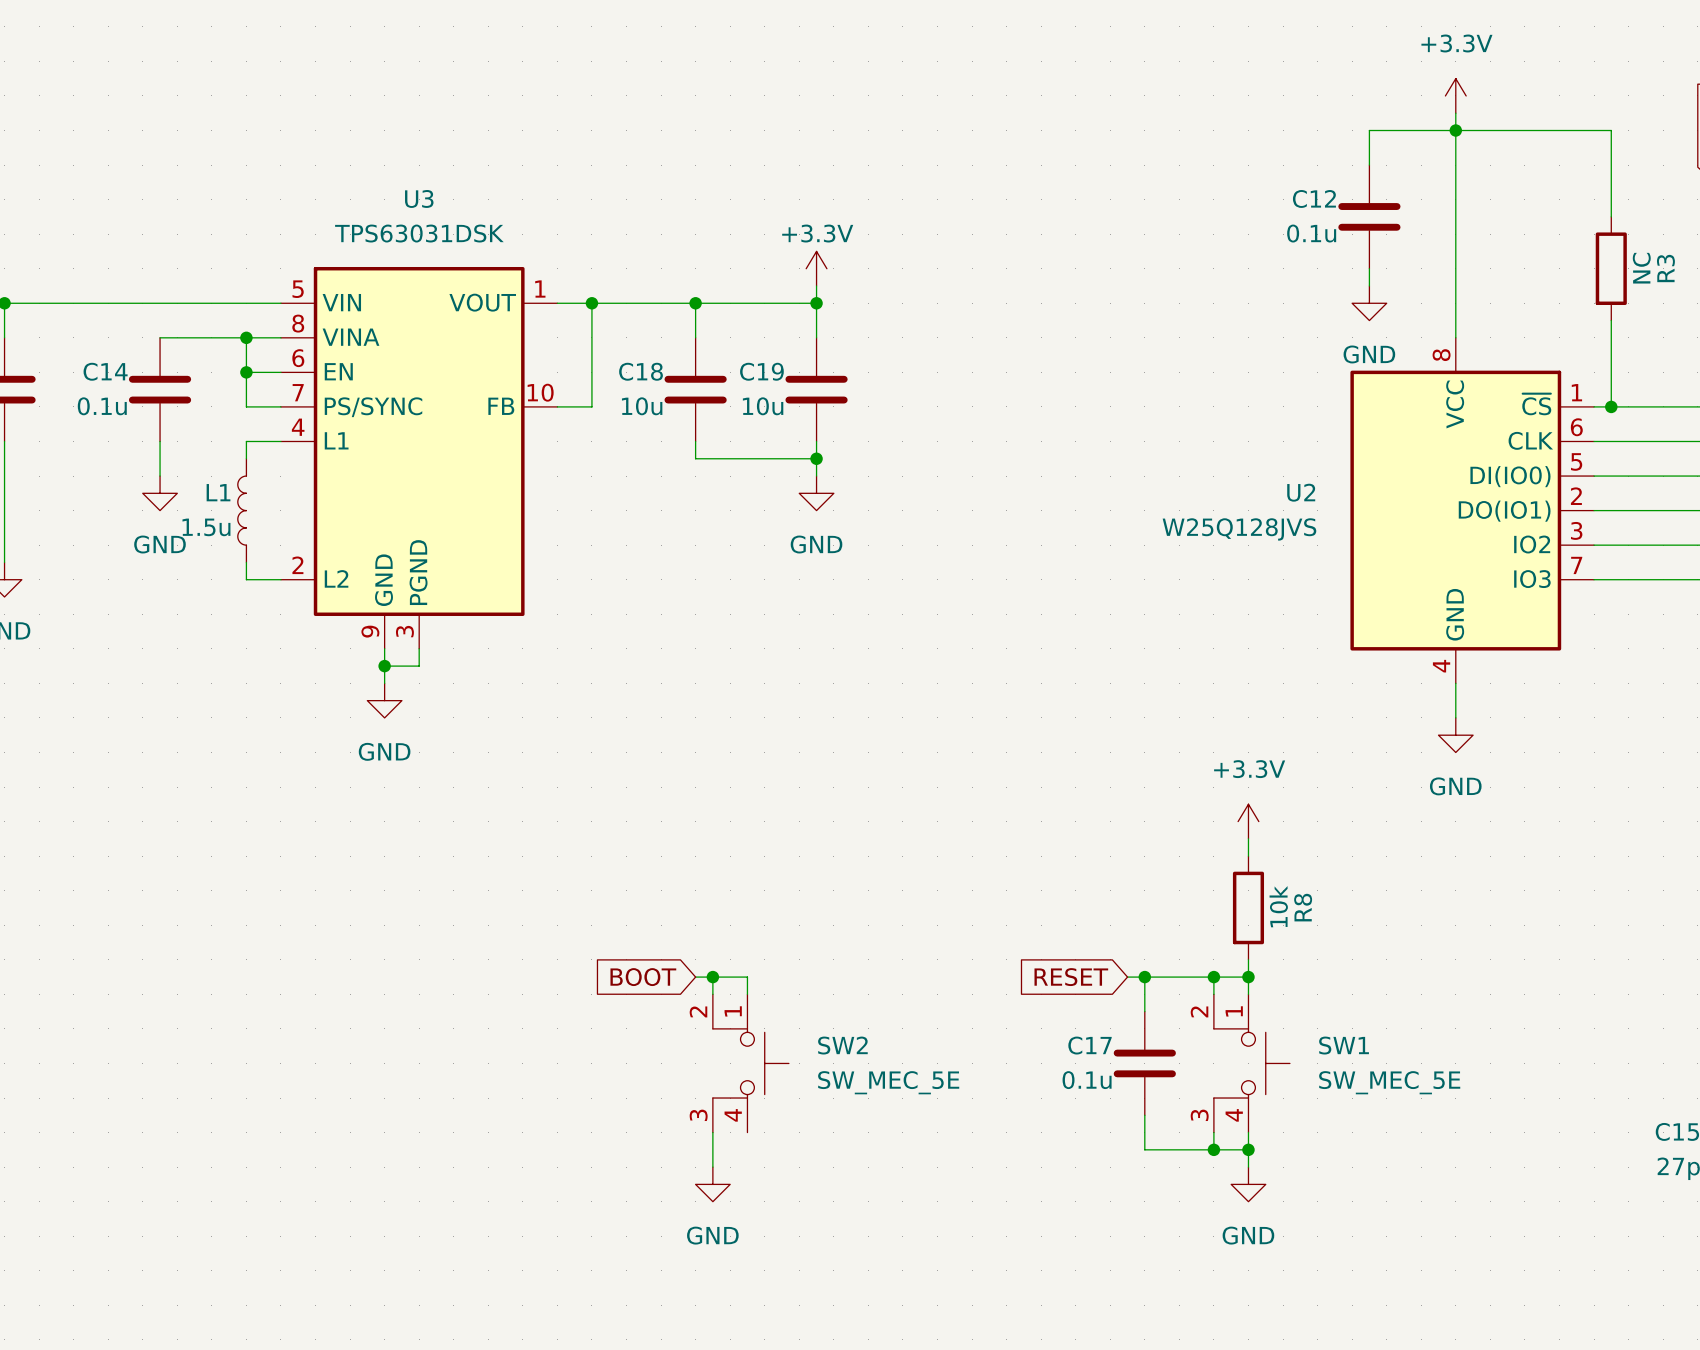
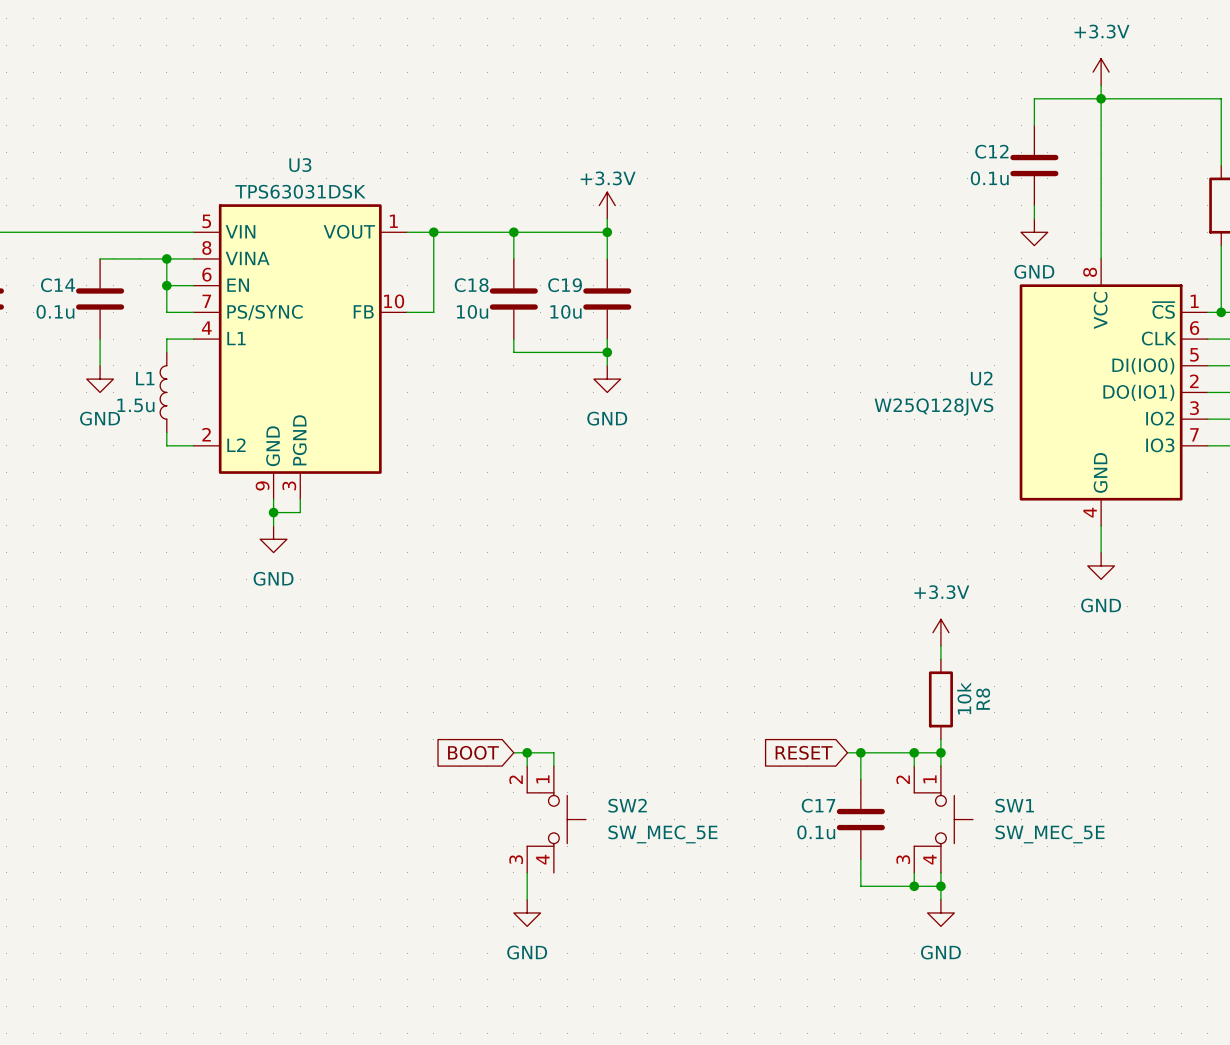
U3 name position: U3 (419, 198) -> U3 (300, 165)
U3 value position: TPS63031DSK (419, 233) -> TPS63031DSK (300, 191)

